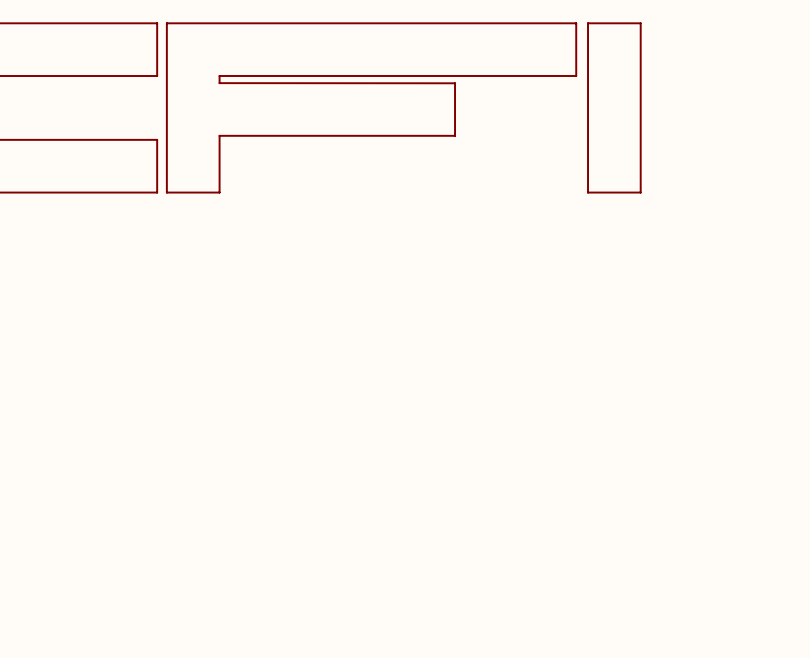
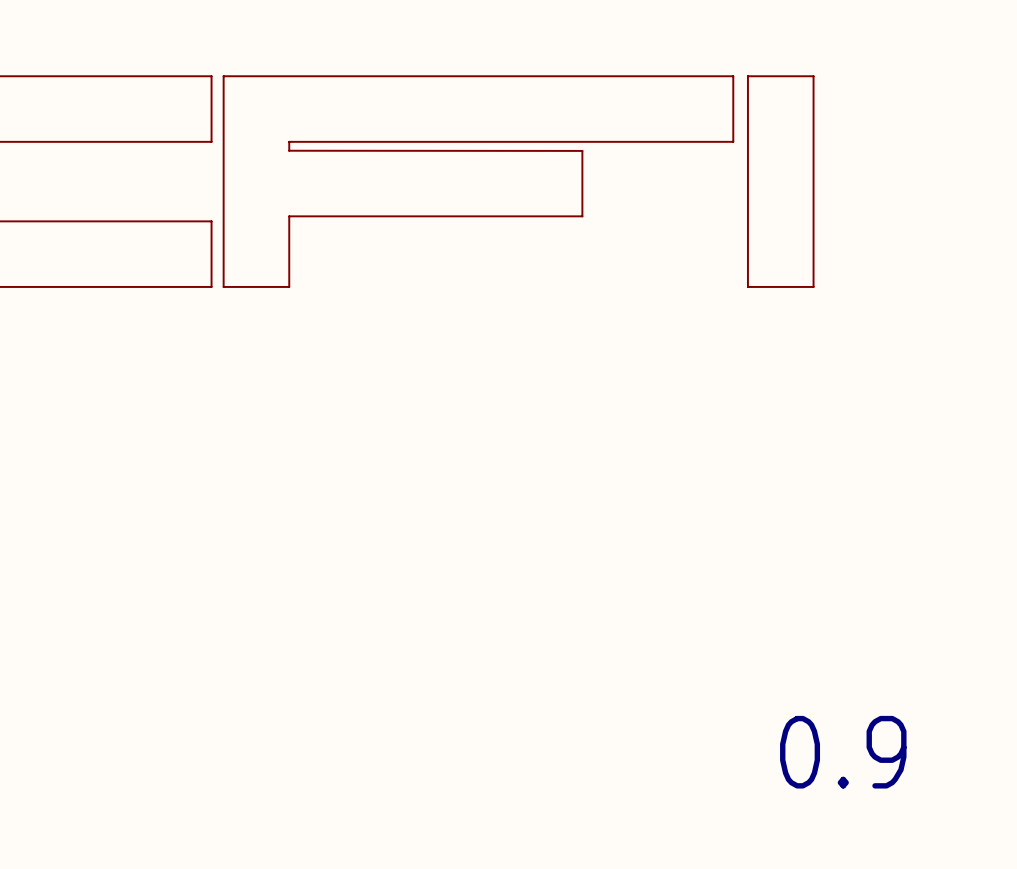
text: none -> 0.9 (843, 752)

